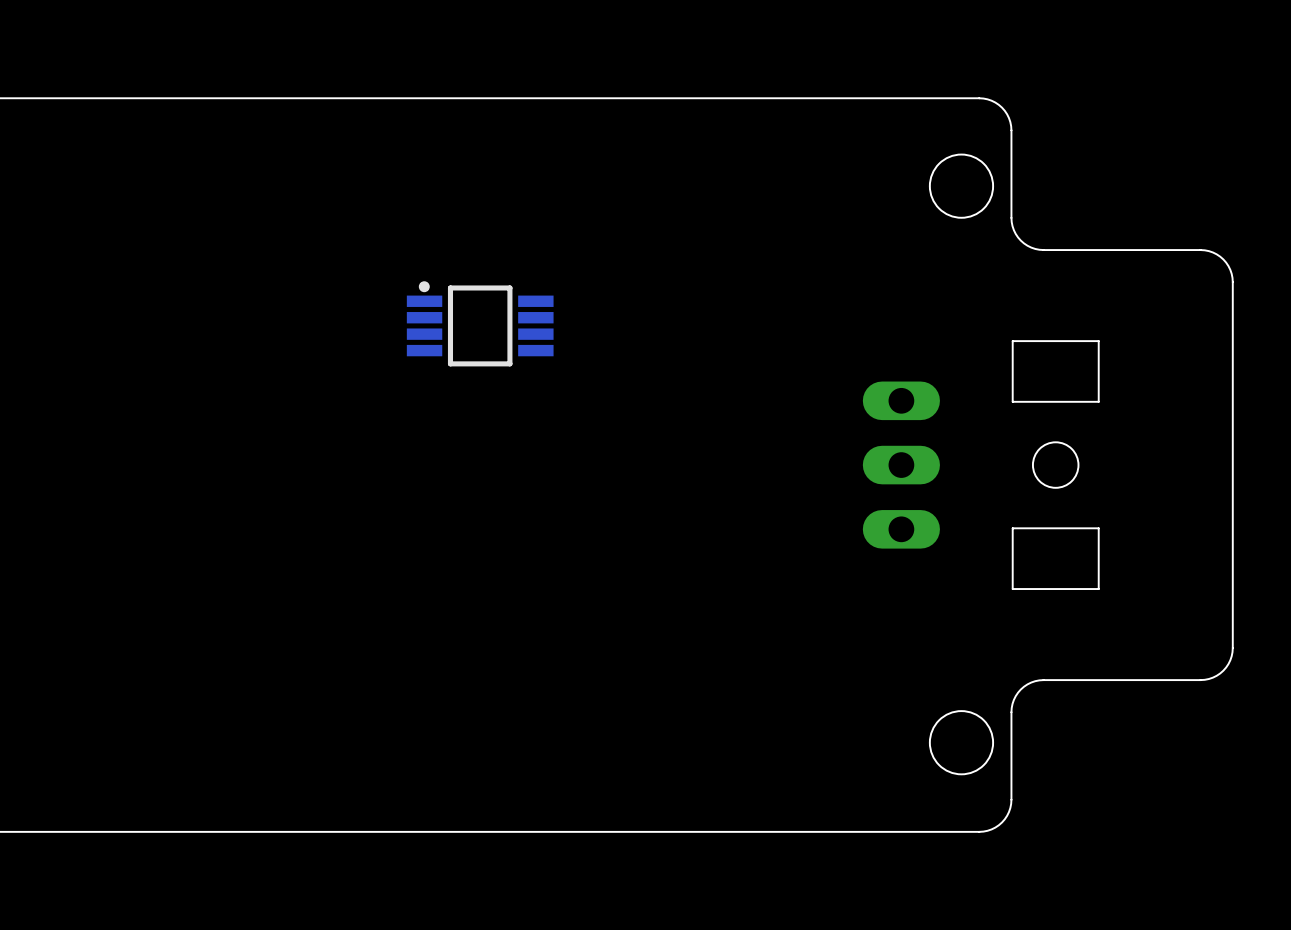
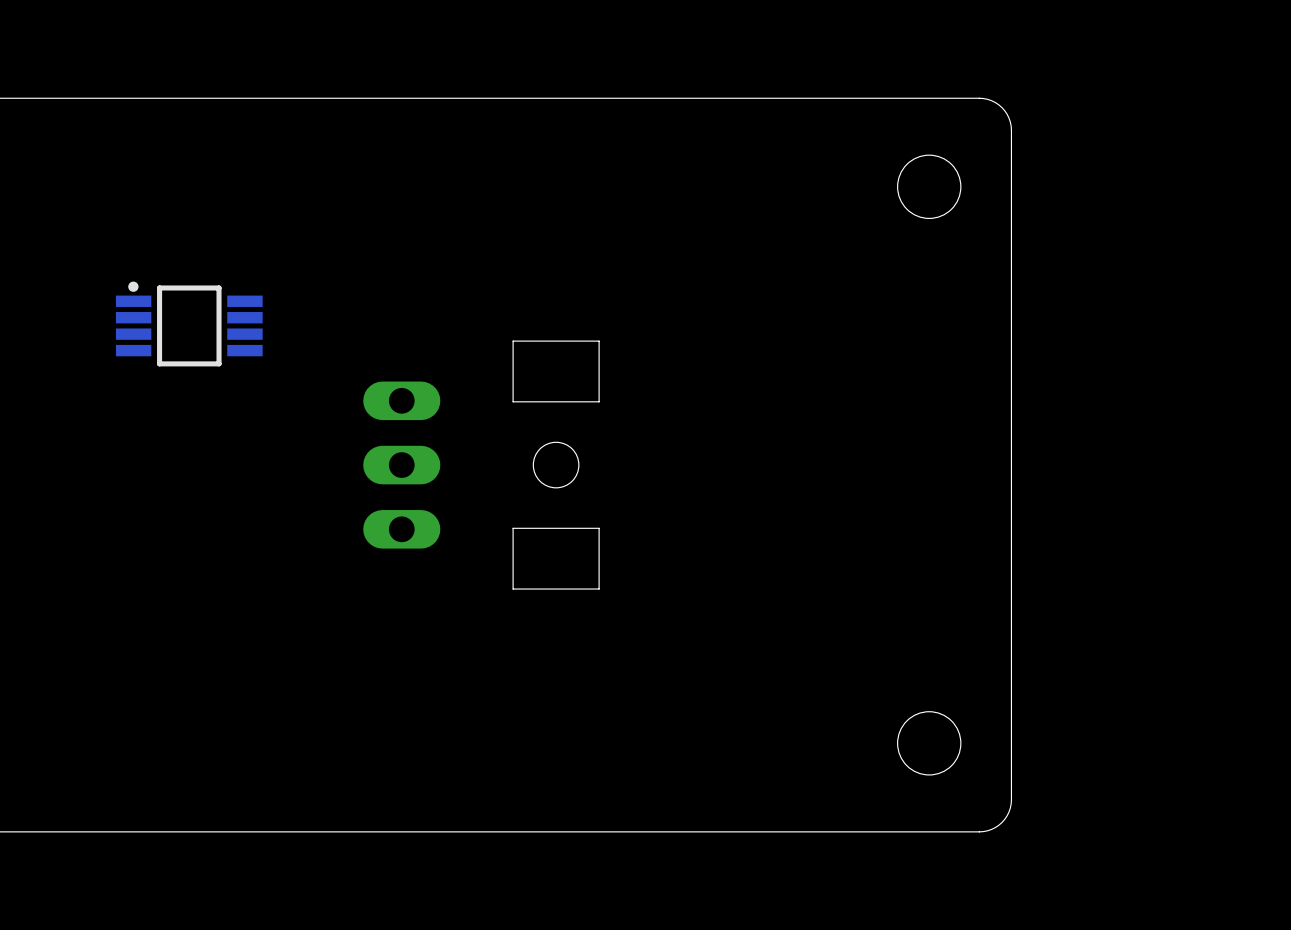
round board edge position: (961, 186) -> (929, 186)
board edge: (1011, 217) (1012, 226) (1018, 237) (1027, 245) (1035, 248) (1204, 250) (1216, 254) (1226, 262) (1231, 273) (1232, 282) (1232, 647) (1228, 664) (1216, 675) (1204, 679) (1035, 681) (1027, 684) (1018, 692) (1012, 703) (1011, 712) -> (1011, 217) (1011, 712)
part position: (480, 323) -> (189, 323)
board edge: (1098, 341) (1098, 401) (1012, 401) (1012, 341) (1098, 341) -> (599, 341) (599, 401) (513, 401) (513, 341) (599, 341)
part position: (901, 465) -> (401, 465)
round board edge position: (1055, 465) -> (556, 465)
board edge: (1098, 528) (1098, 589) (1012, 589) (1012, 528) (1098, 528) -> (599, 528) (599, 589) (513, 589) (513, 528) (599, 528)
round board edge position: (961, 742) -> (929, 743)

